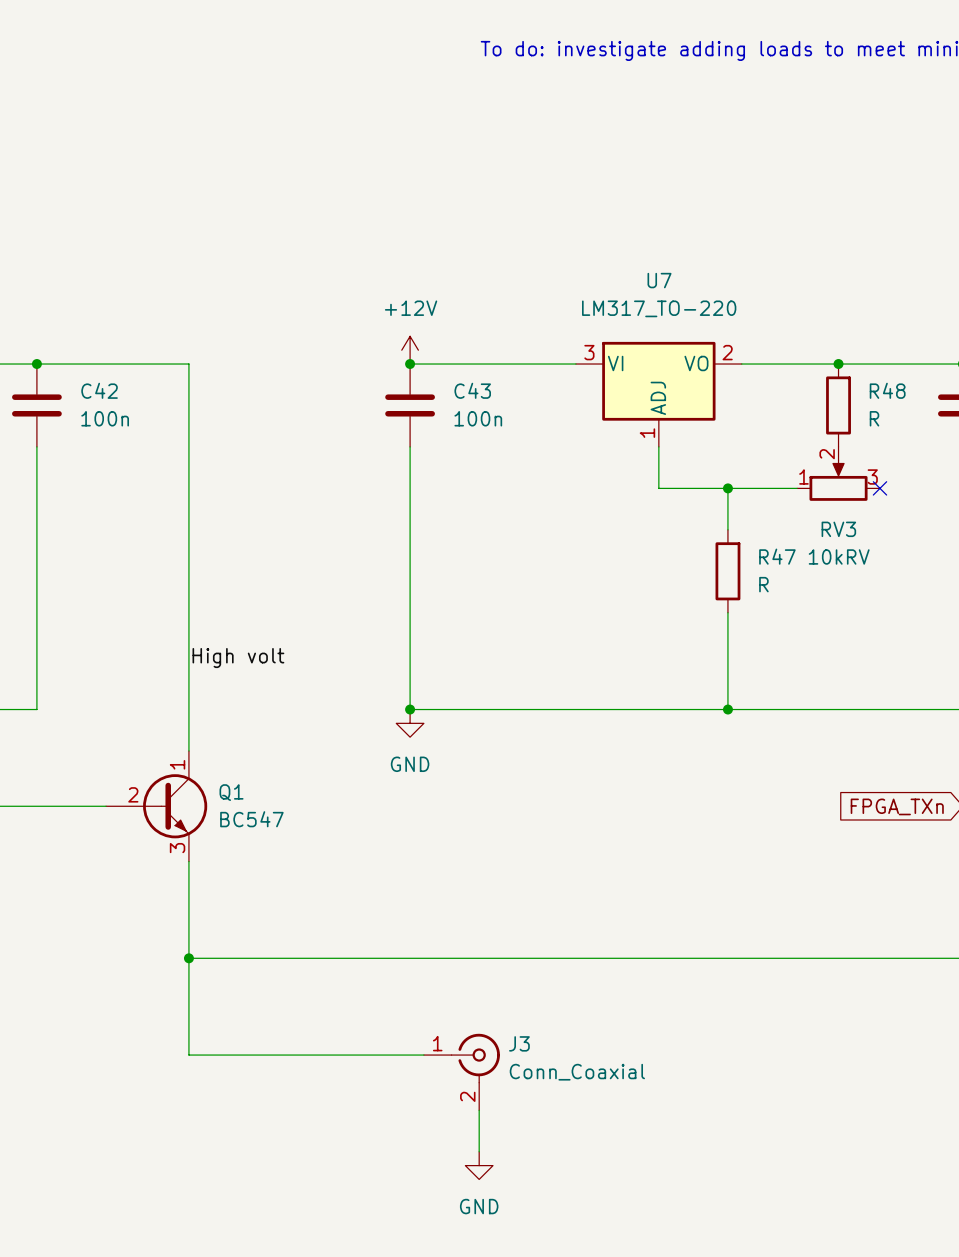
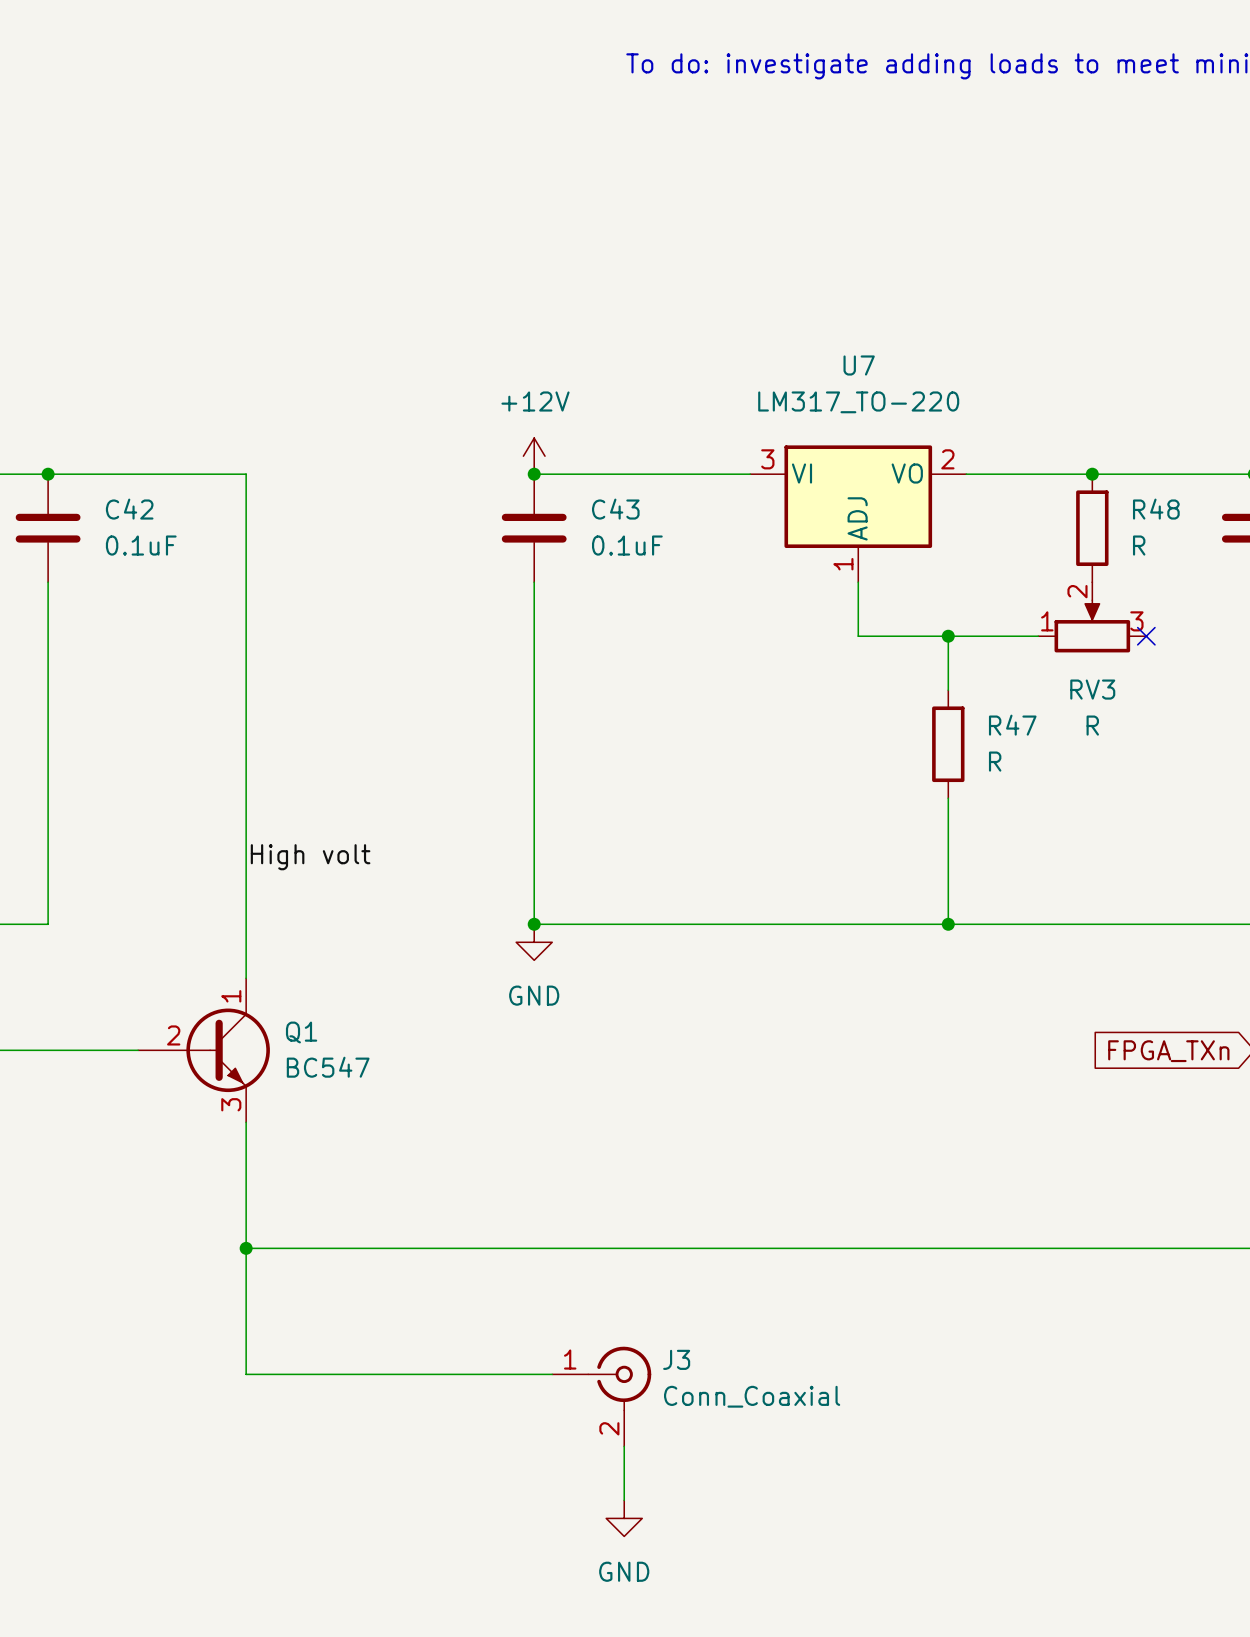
C42 value: 100n (105, 418) -> 0.1uF (141, 545)
C43 value: 100n (478, 418) -> 0.1uF (627, 545)
RV3 value: 10kRV (839, 556) -> R (1092, 725)

